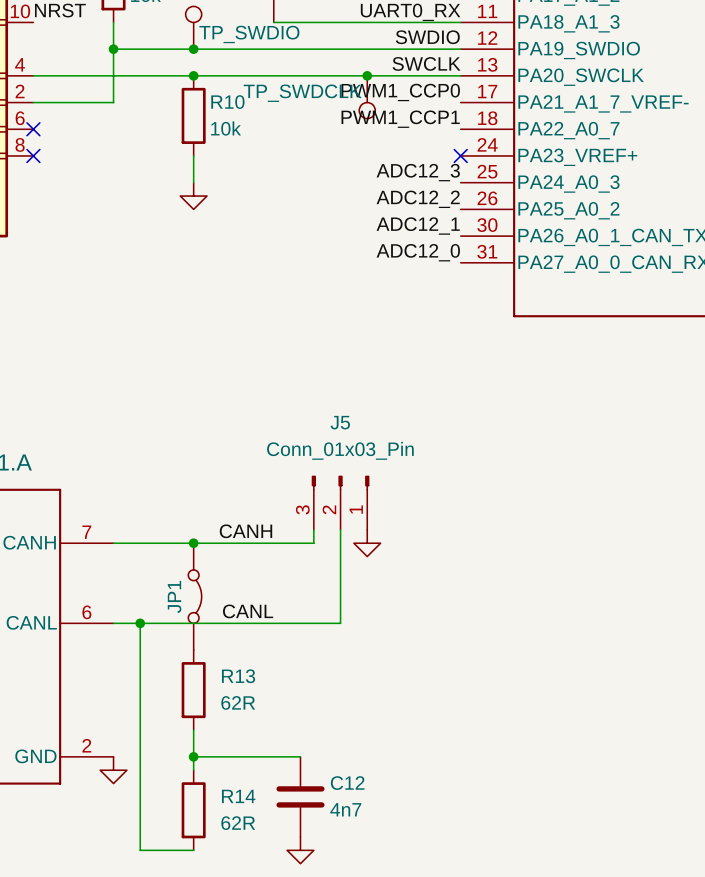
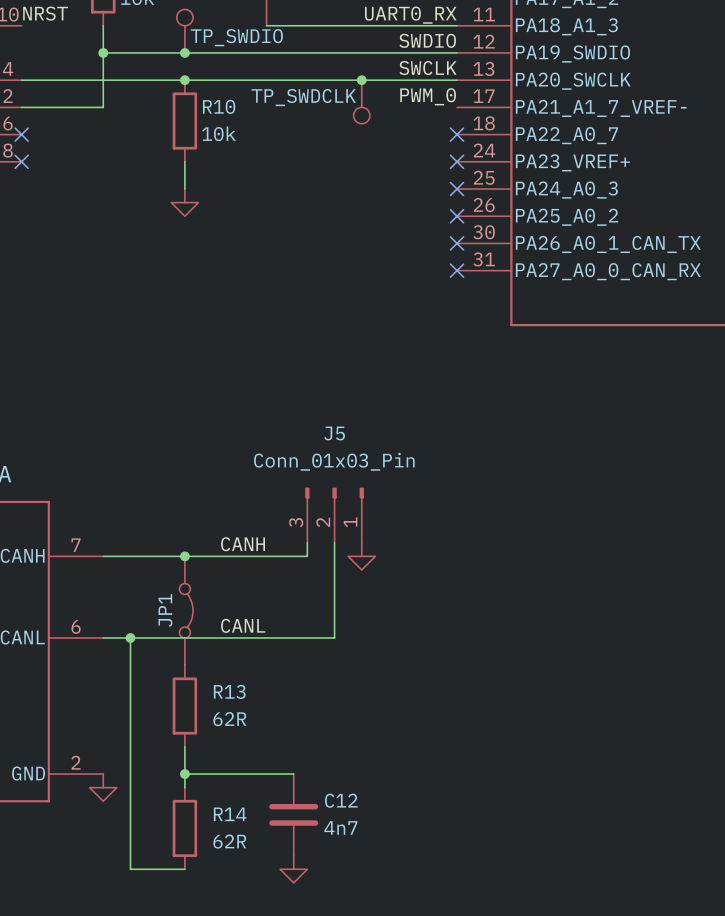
label: PWM1_CCP0 (400, 92) -> PWM_0 (428, 96)
label: PWM1_CCP1 (400, 119) -> none
no-connect mark: none -> (457, 134)
label: ADC12_3 (418, 172) -> none
no-connect mark: none -> (457, 189)
label: ADC12_2 (418, 199) -> none
no-connect mark: none -> (457, 216)
label: ADC12_1 (418, 226) -> none
no-connect mark: none -> (457, 243)
label: ADC12_0 (418, 252) -> none
no-connect mark: none -> (457, 270)

